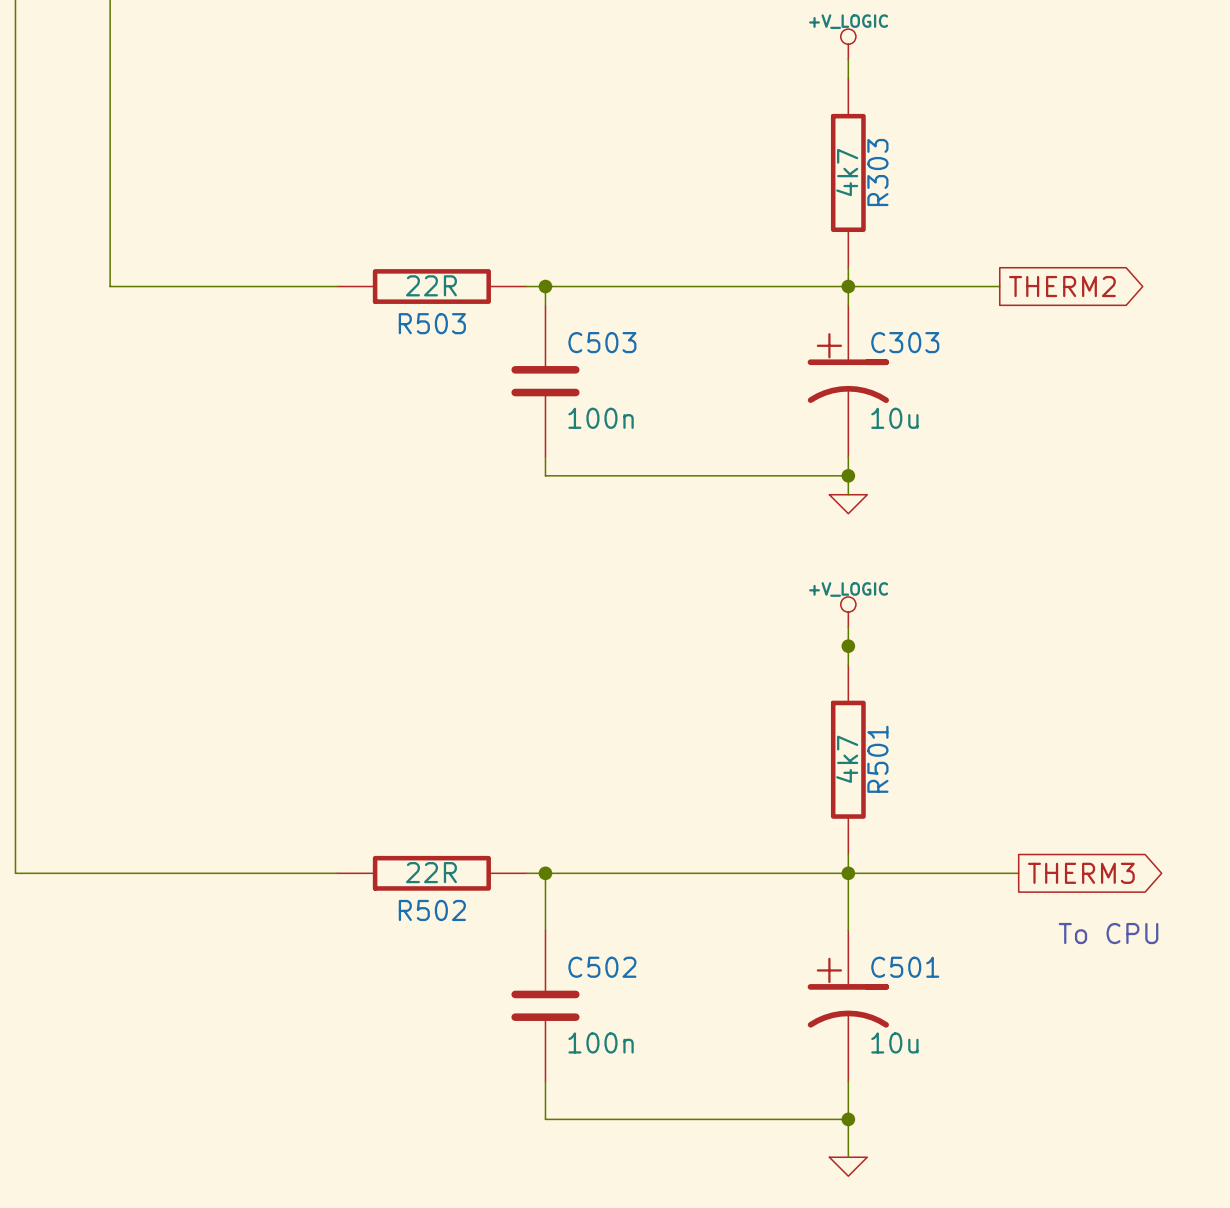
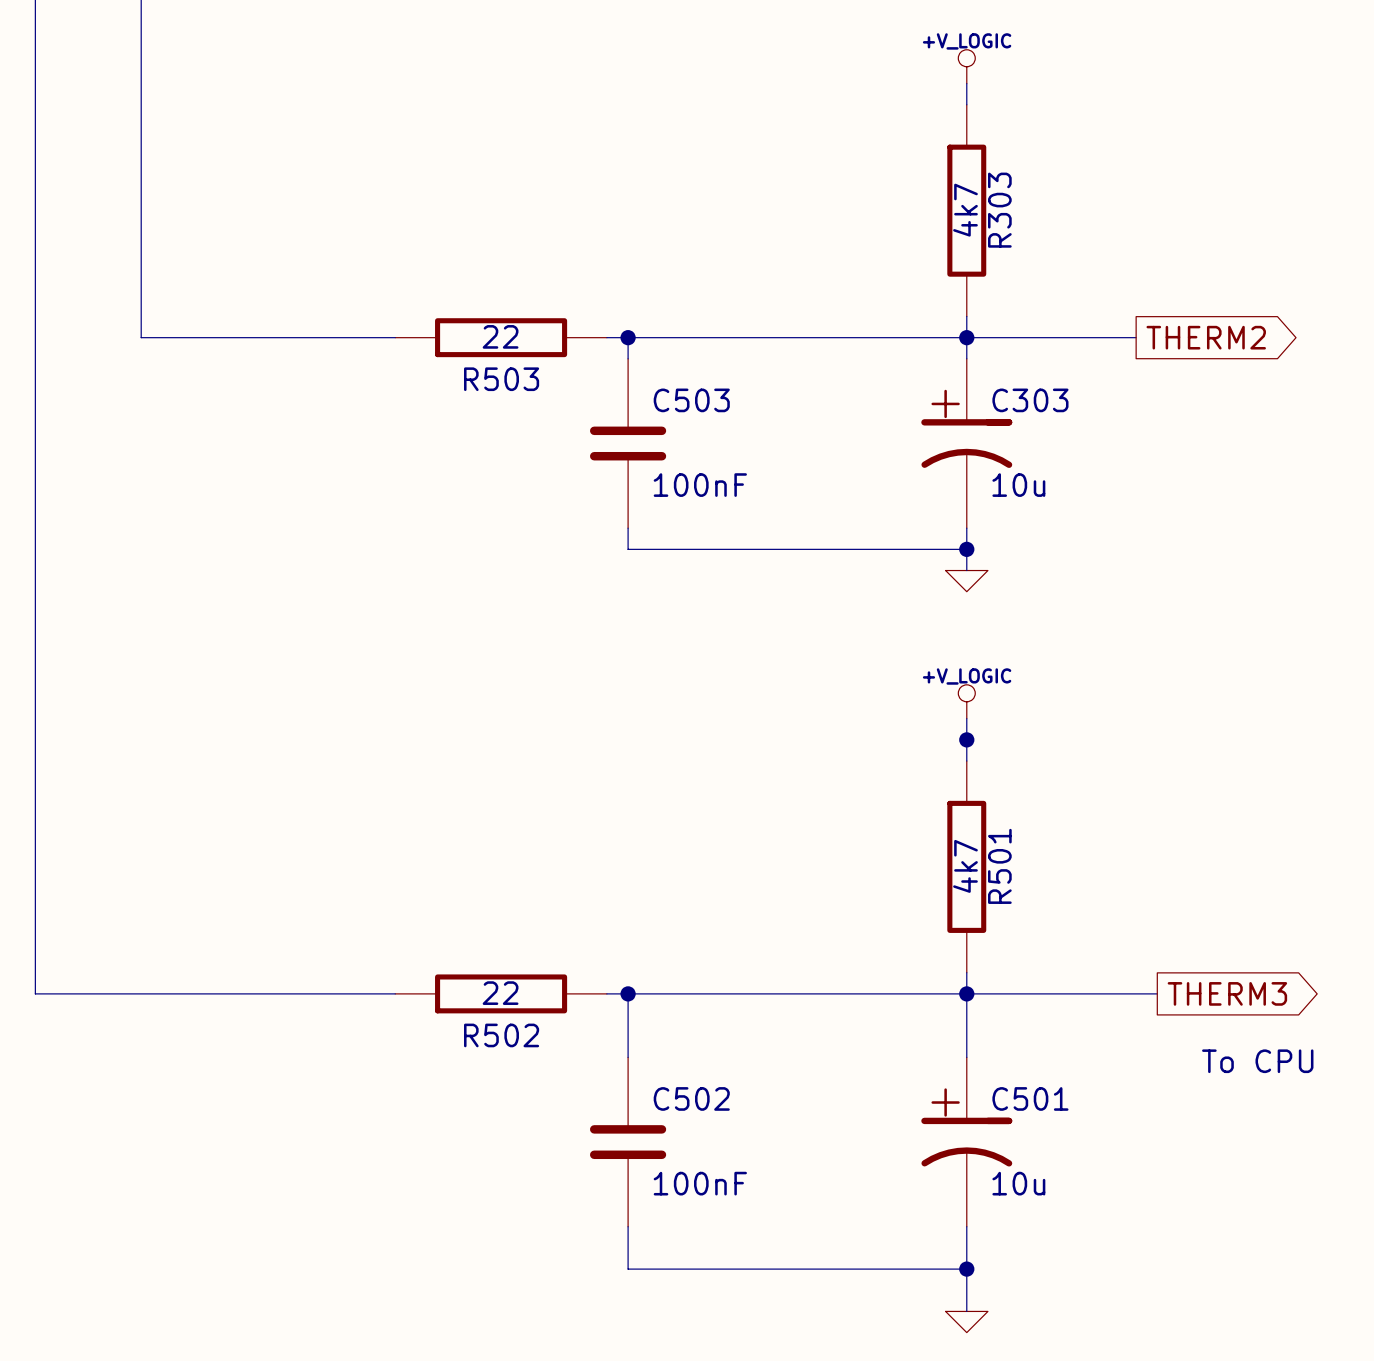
R503 value: 22R (431, 285) -> 22 (500, 336)
C503 value: 100n (601, 418) -> 100nF (700, 485)
R502 value: 22R (431, 872) -> 22 (500, 993)
C502 value: 100n (601, 1042) -> 100nF (700, 1183)

